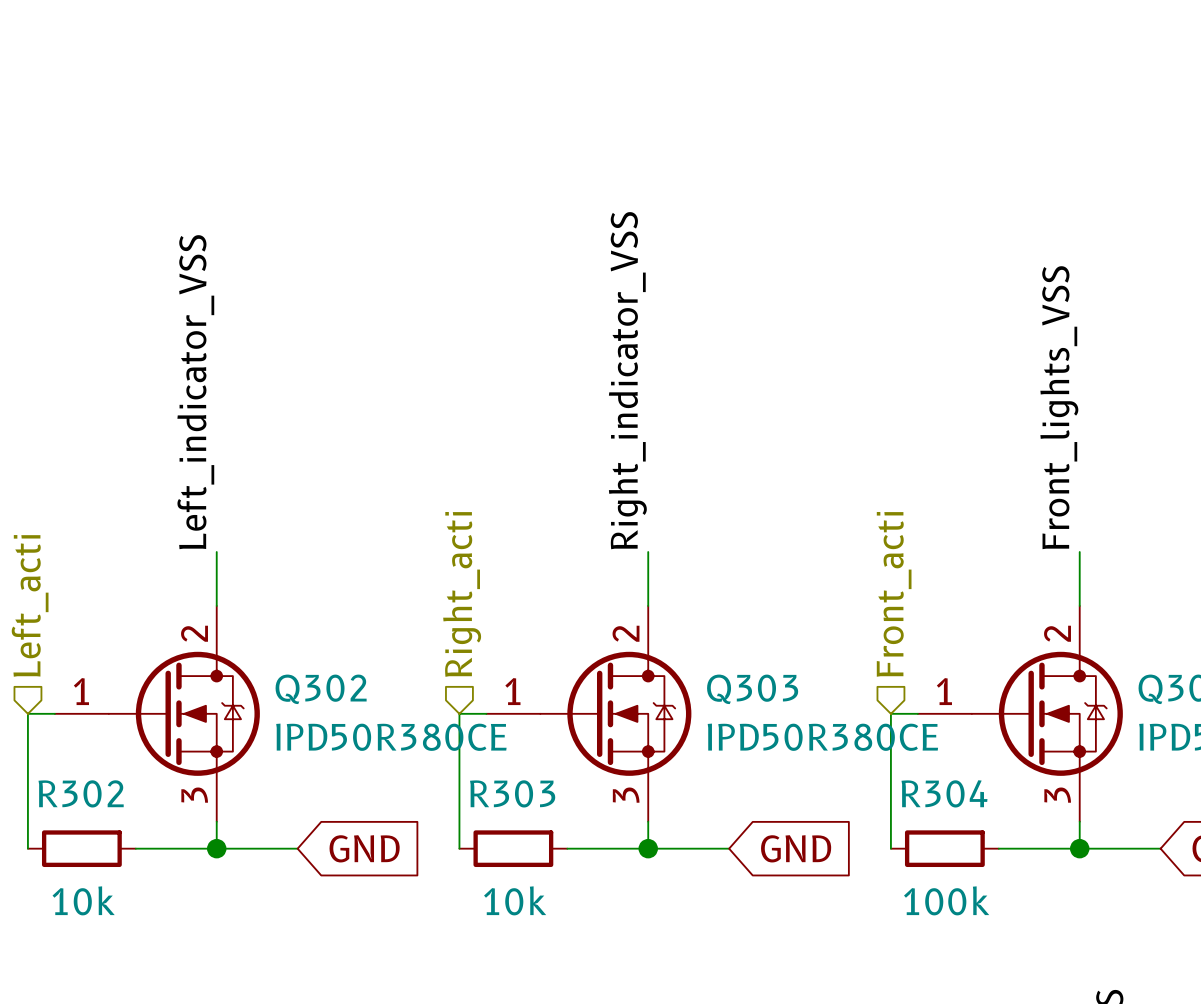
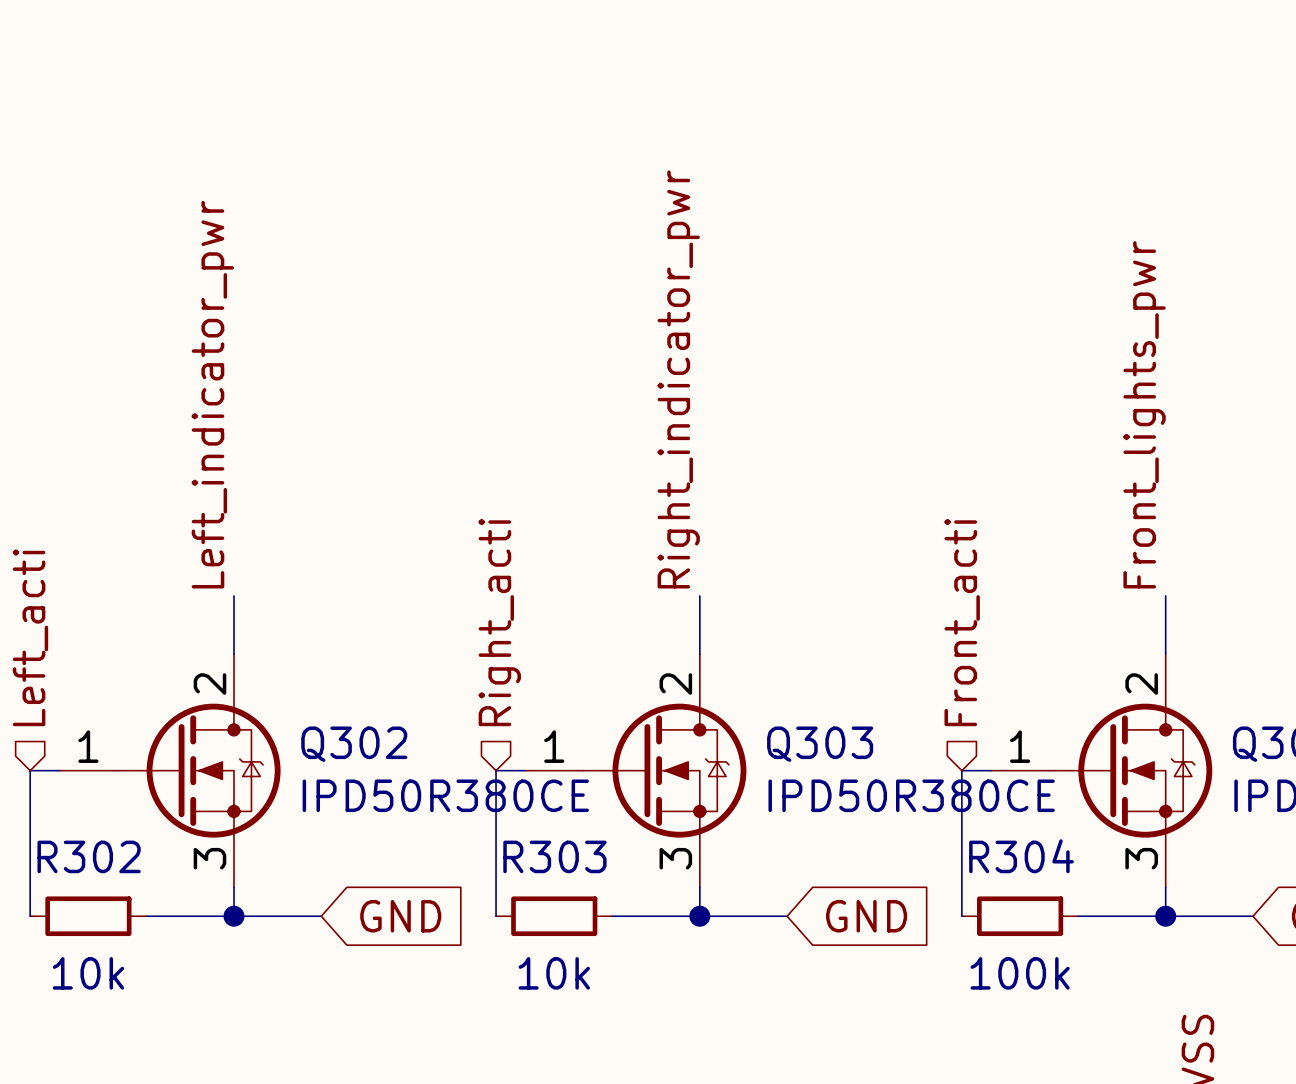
label: Right_indicator_VSS (627, 380) -> Right_indicator_pwr (678, 379)
label: Left_indicator_VSS (195, 392) -> Left_indicator_pwr (212, 394)
label: Front_lights_VSS (1059, 407) -> Front_lights_pwr (1144, 414)

